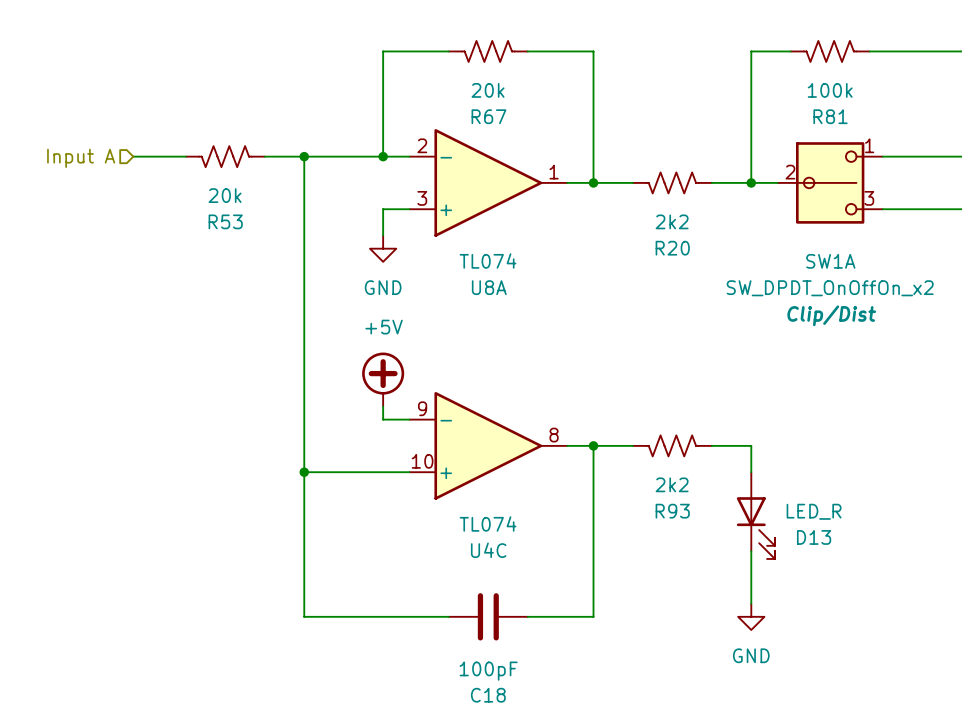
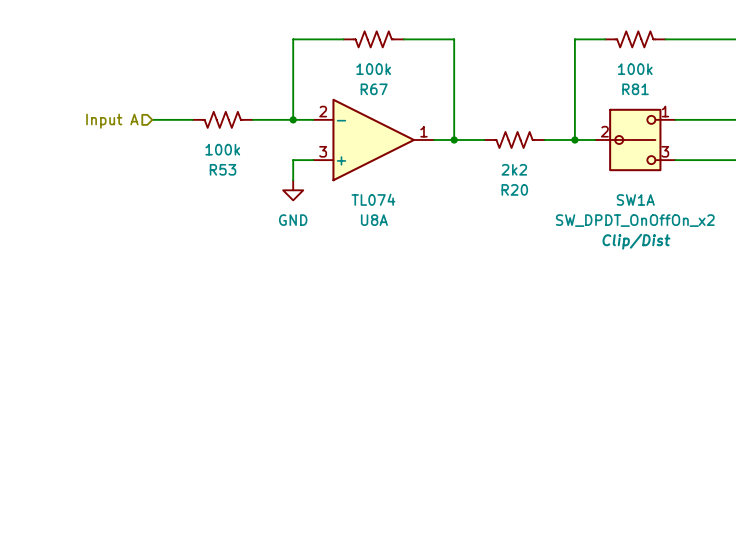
R67 value: 20k (488, 90) -> 100k (373, 69)
wire: (133, 156) (185, 156) -> (152, 119) (192, 119)
R53 position: (225, 156) -> (222, 119)
wire: (264, 156) (330, 156) -> none
wire: (304, 156) (304, 616) (448, 616) -> none
junction: (304, 156) -> none
hierarchical label position: Input A (81, 158) -> Input A (112, 121)
R53 value: 20k (225, 195) -> 100k (222, 149)
power symbol: +5V (383, 379) -> none
wire: (383, 406) (383, 419) (409, 419) -> none
U4C: TL074 (488, 445) -> none
wire: (567, 445) (632, 445) -> none
wire: (593, 445) (593, 616) (527, 616) -> none
junction: (593, 445) -> none
R93: 2k2 (672, 445) -> none
wire: (711, 445) (751, 445) (751, 472) -> none
wire: (304, 472) (409, 472) -> none
junction: (304, 472) -> none
D13: LED_R (755, 515) -> none
wire: (751, 551) (751, 603) -> none
C18: 100pF (488, 616) -> none
power symbol: GND (751, 616) -> none

